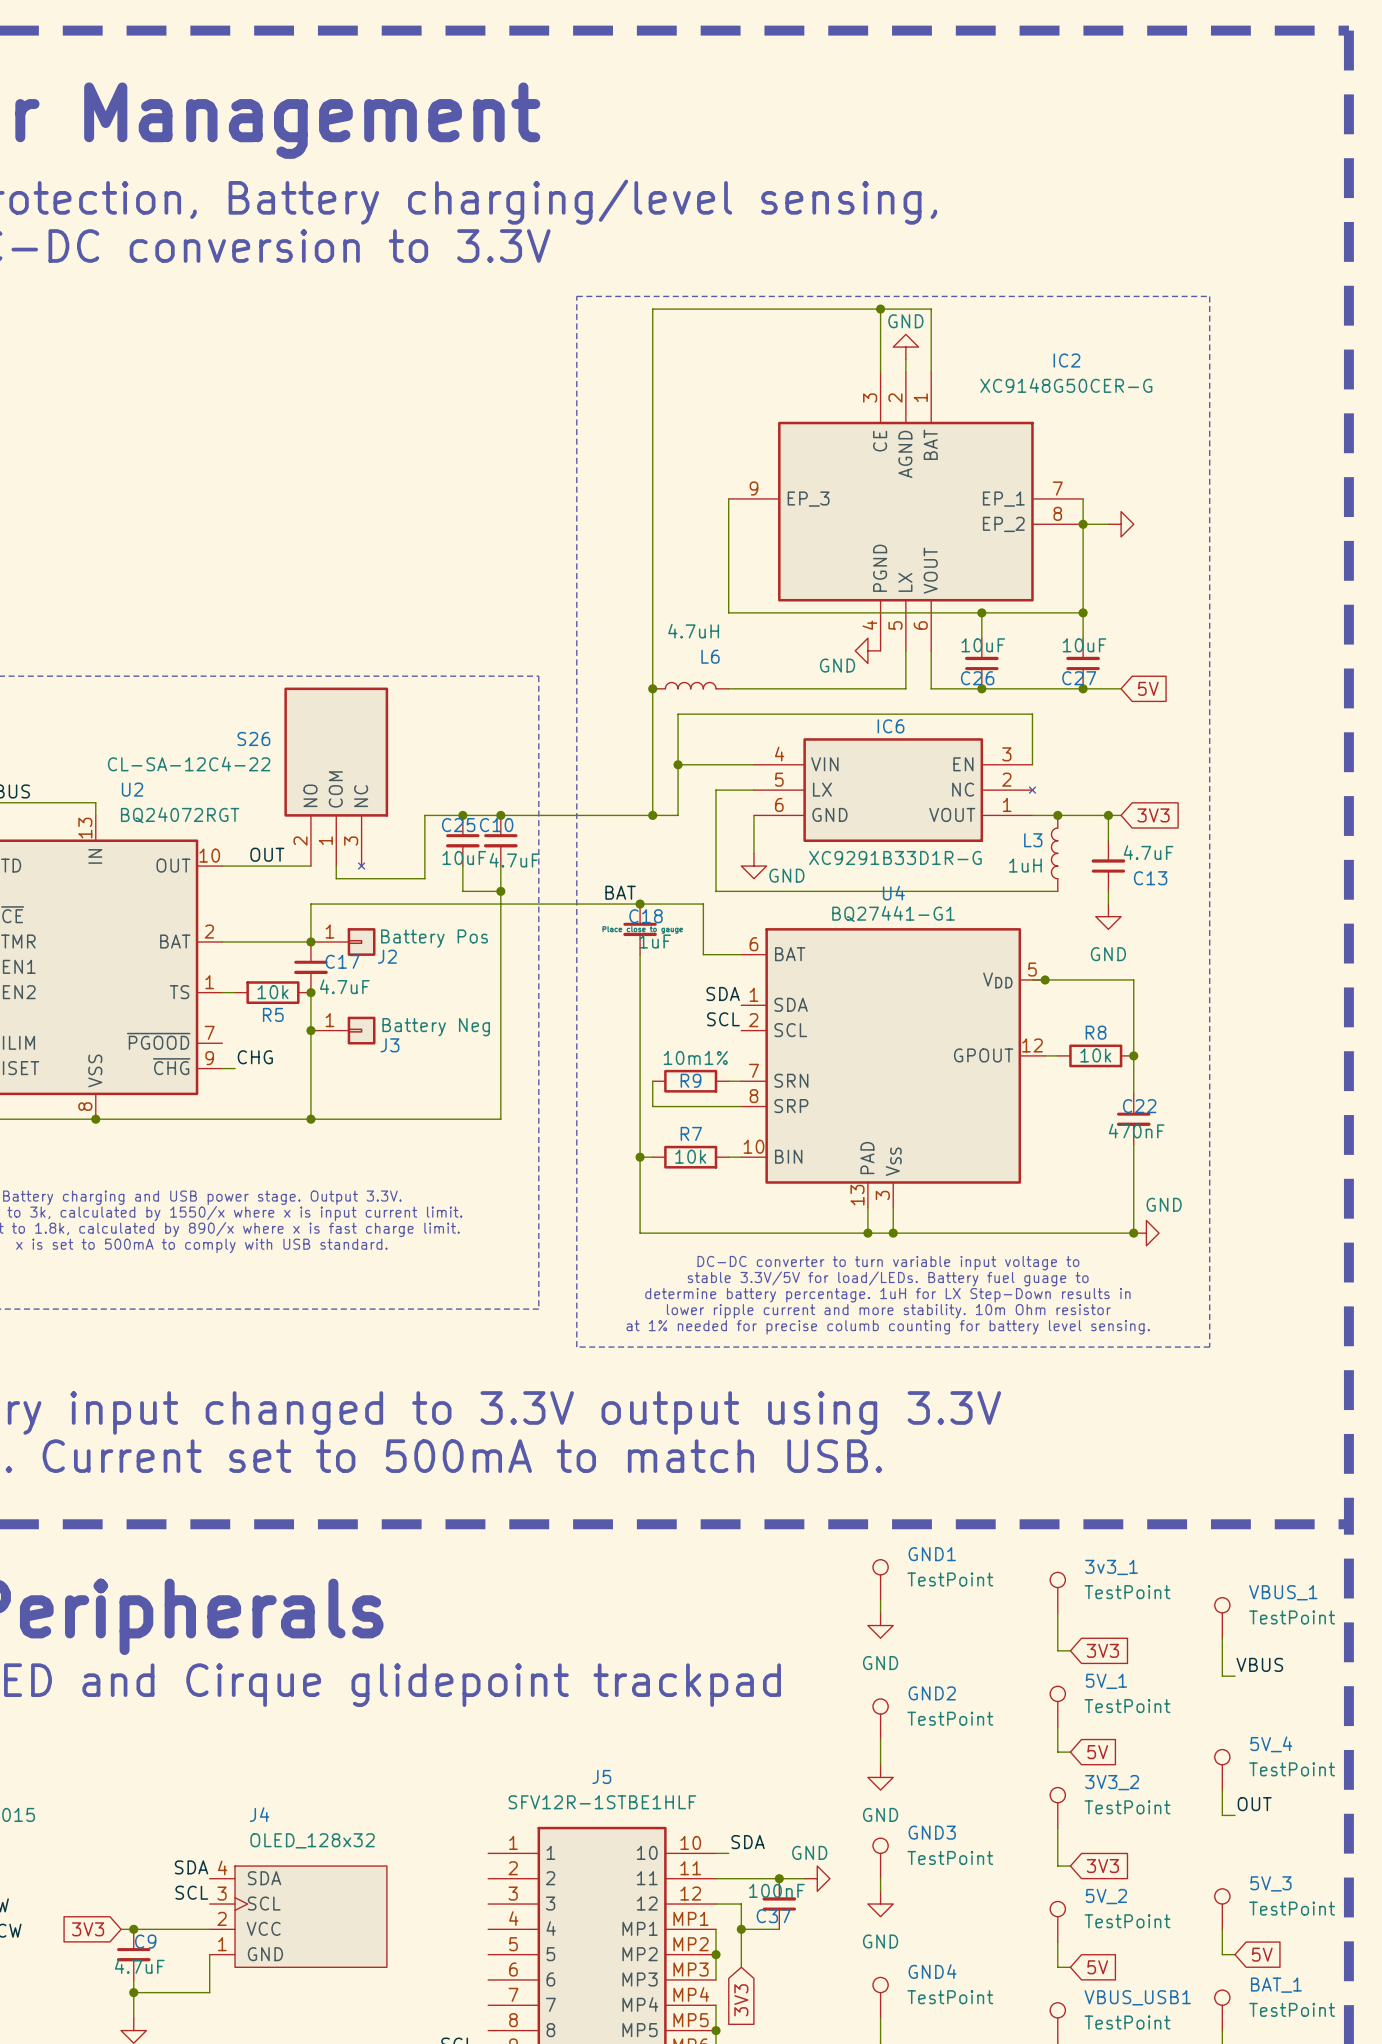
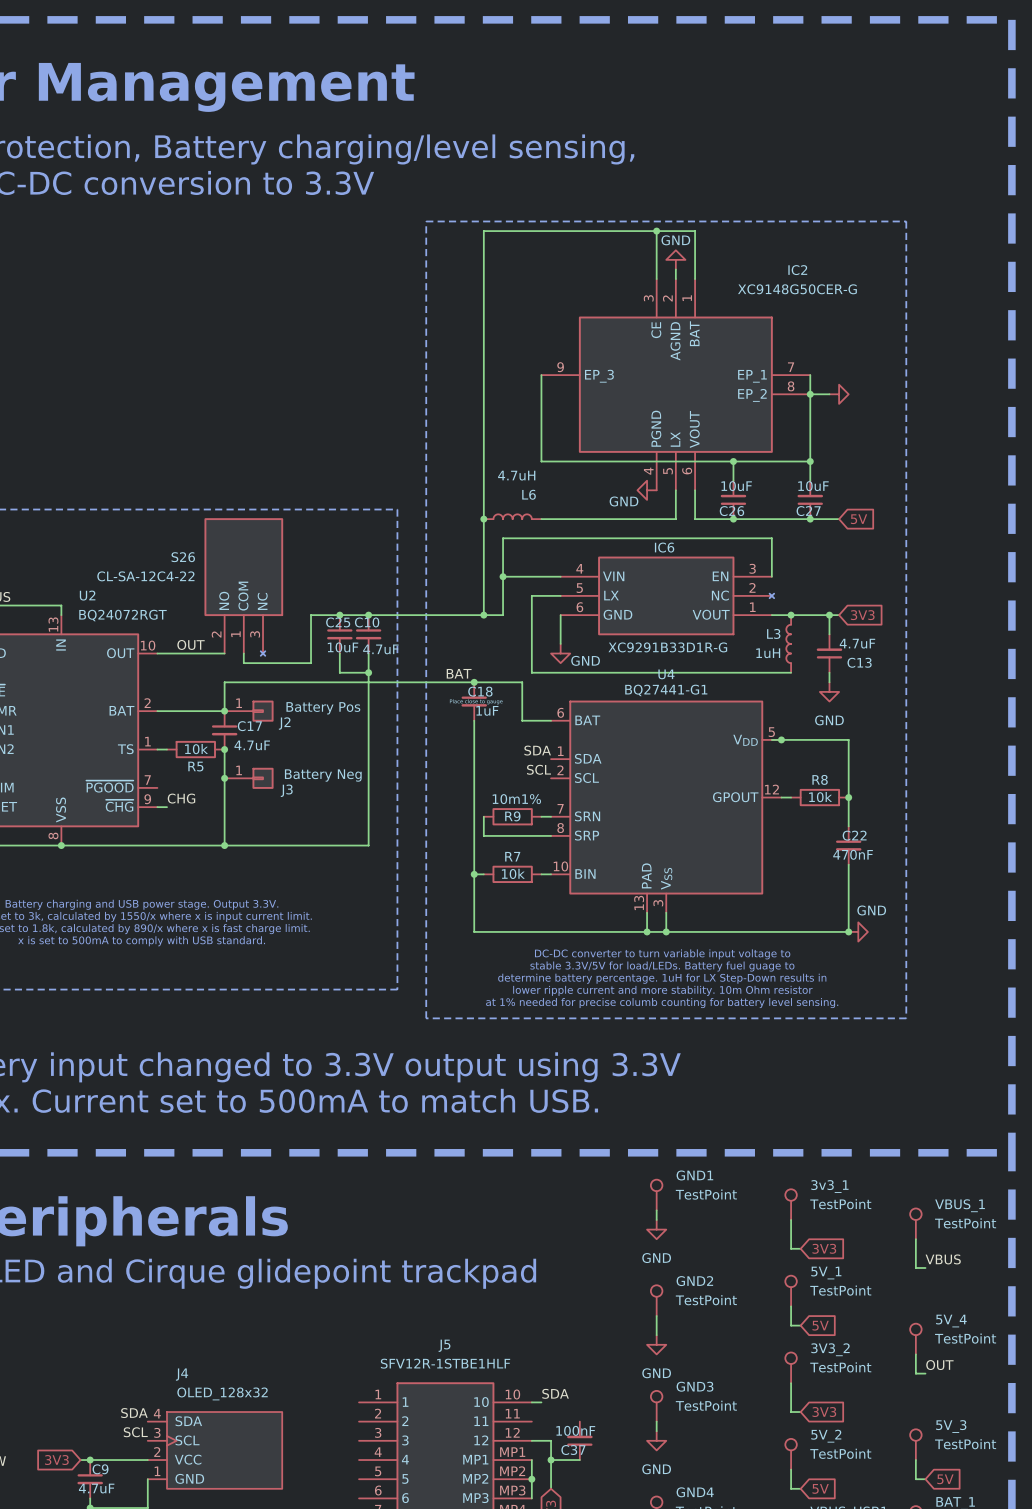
wire: (716, 1878) (804, 1878) -> none
junction: (779, 1878) -> none
power symbol: GND (817, 1878) -> none

